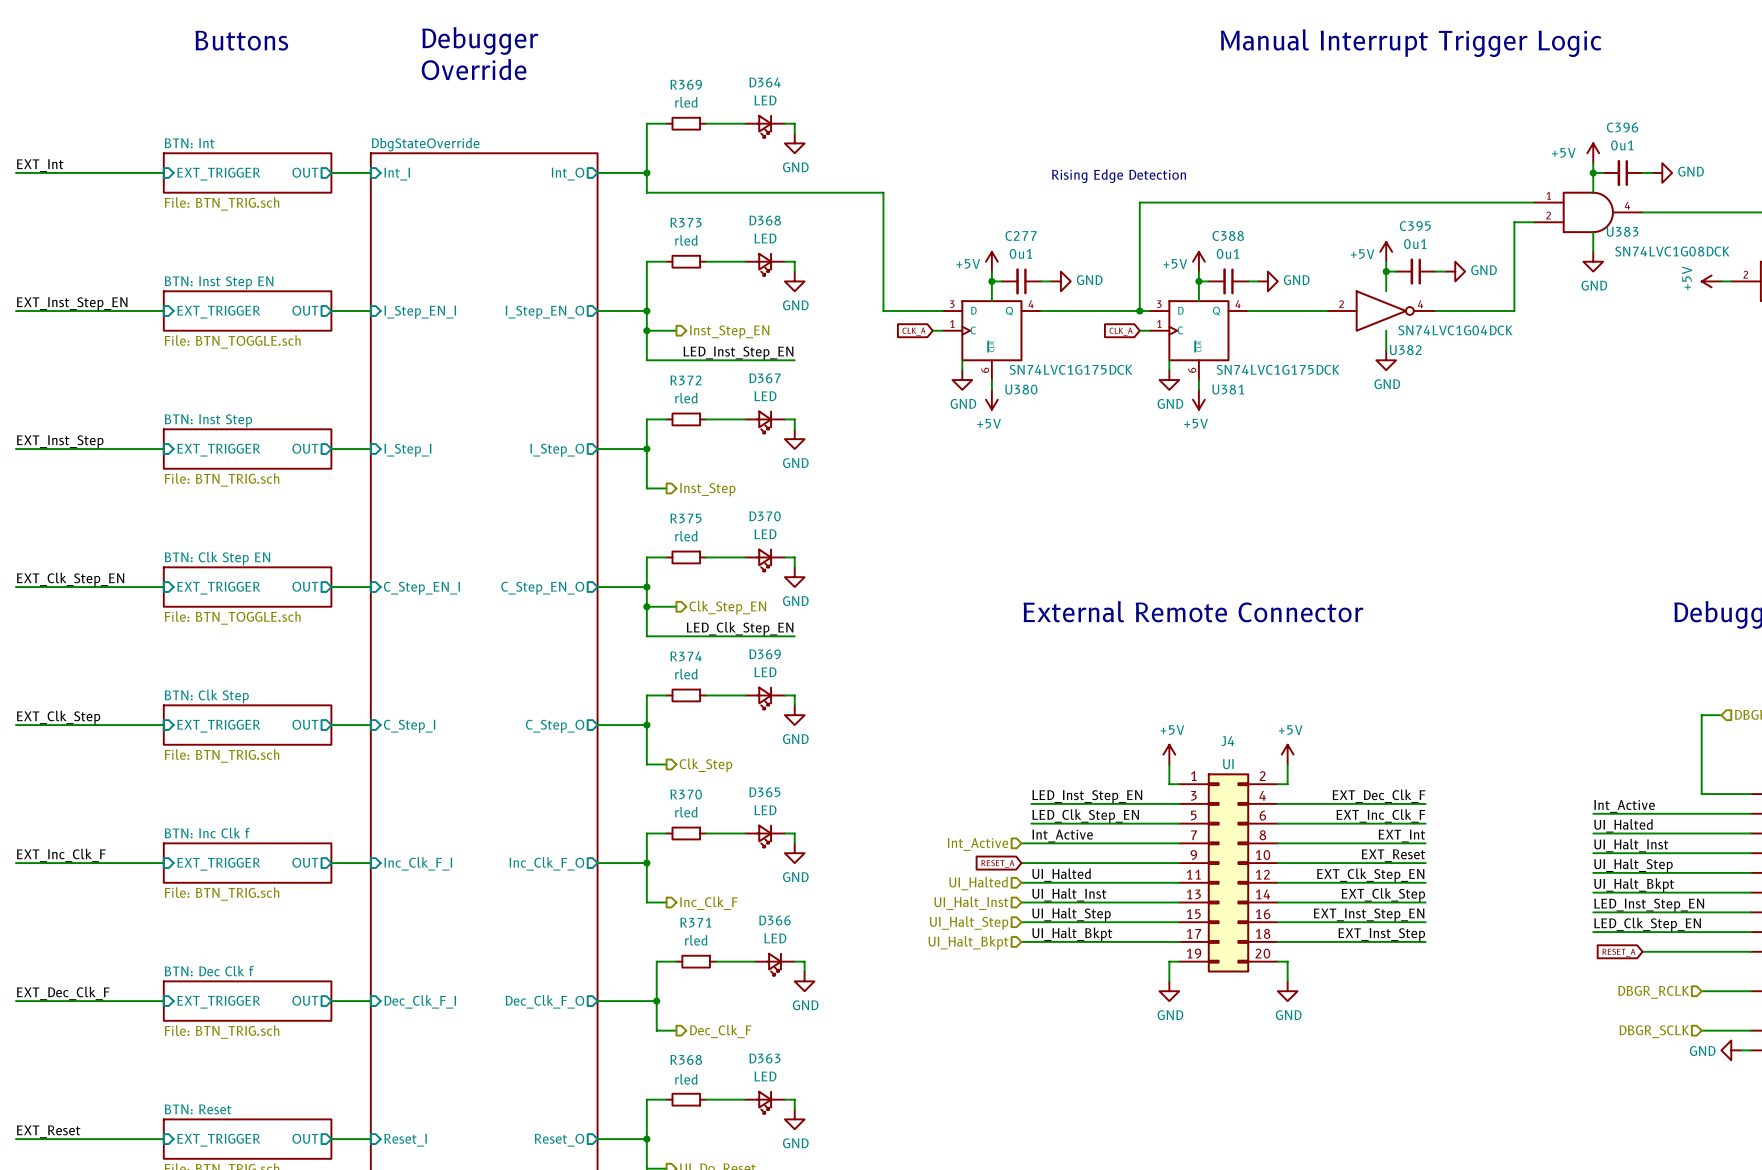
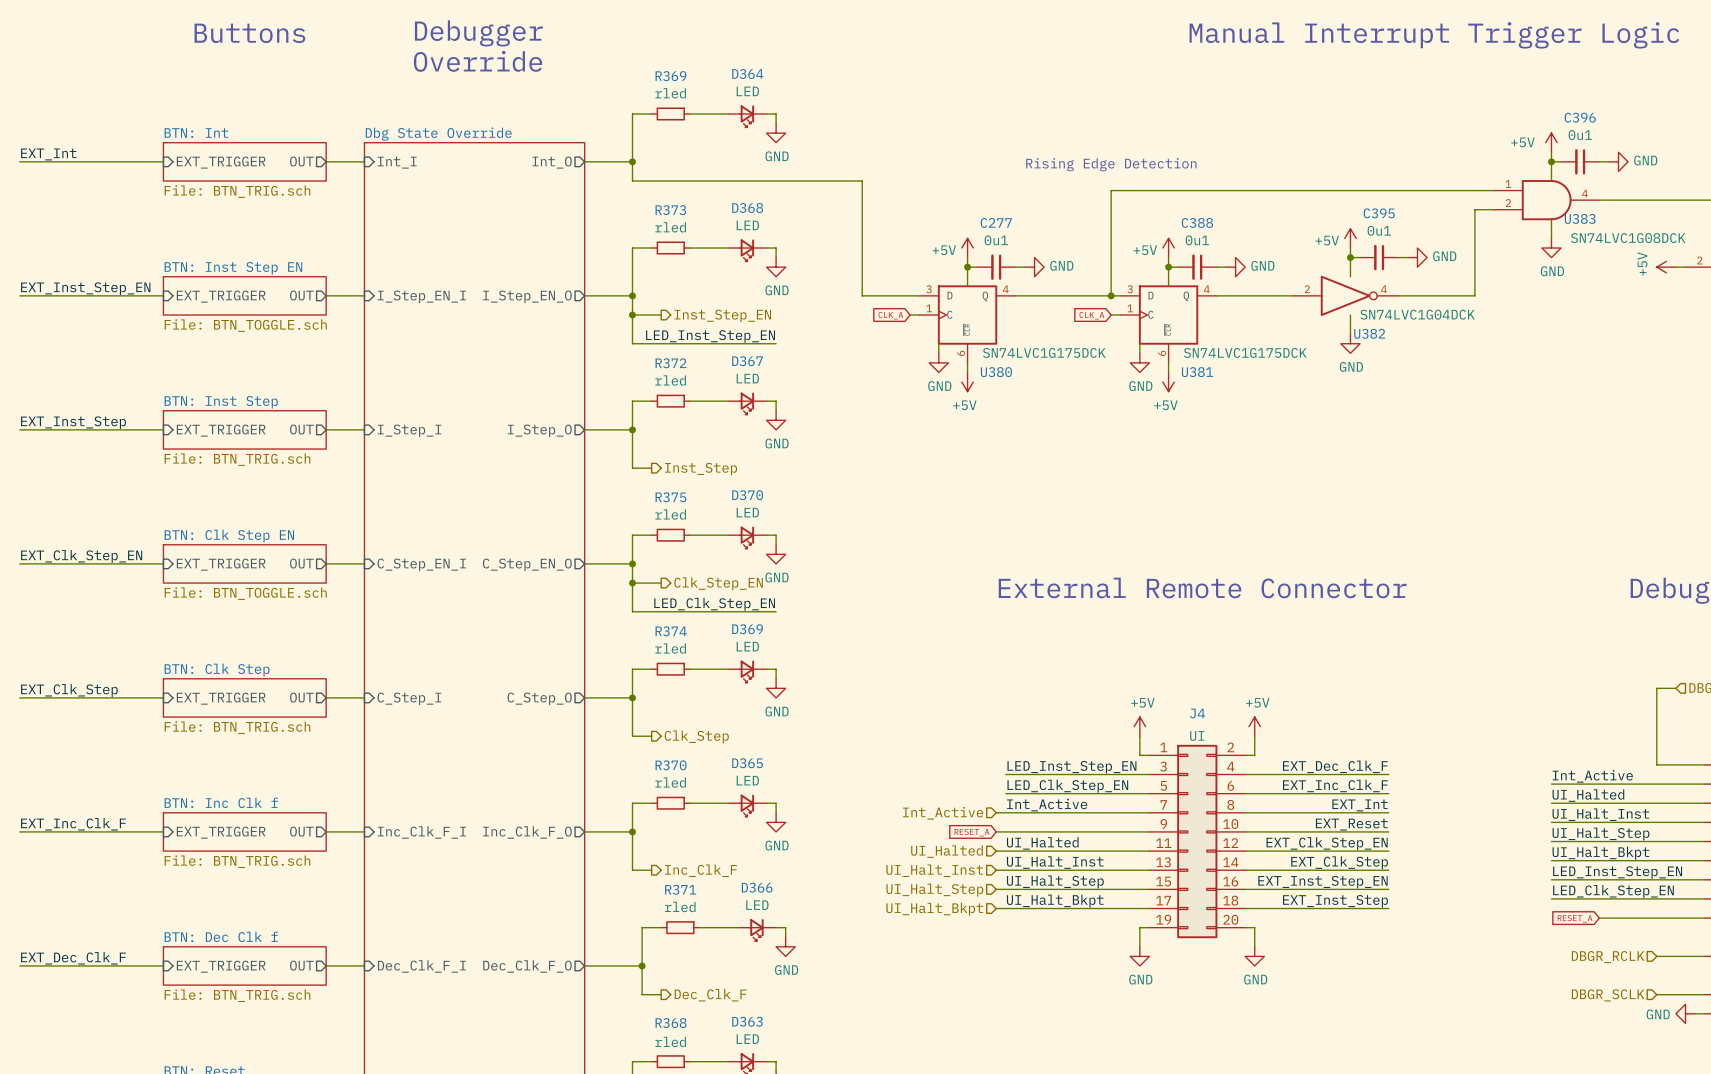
sheet DbgStateOverride name: DbgStateOverride (425, 144) -> Dbg State Override (438, 134)

